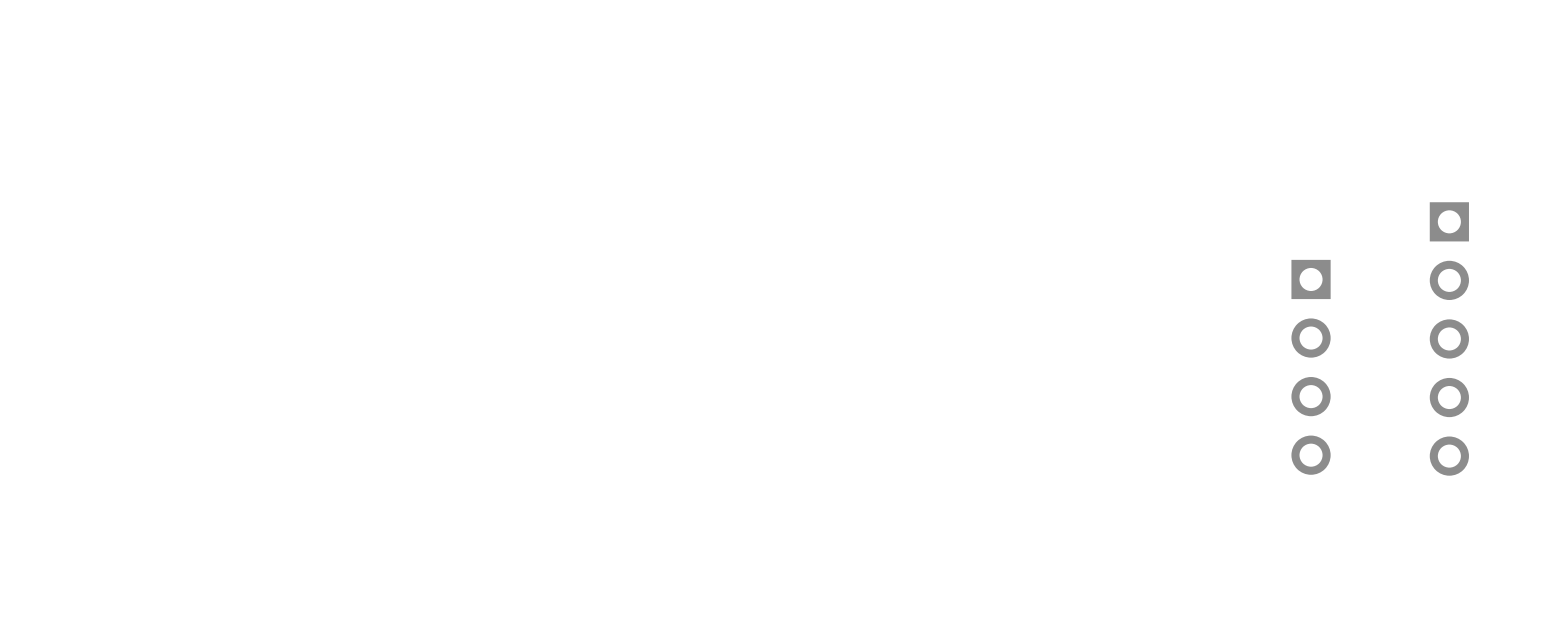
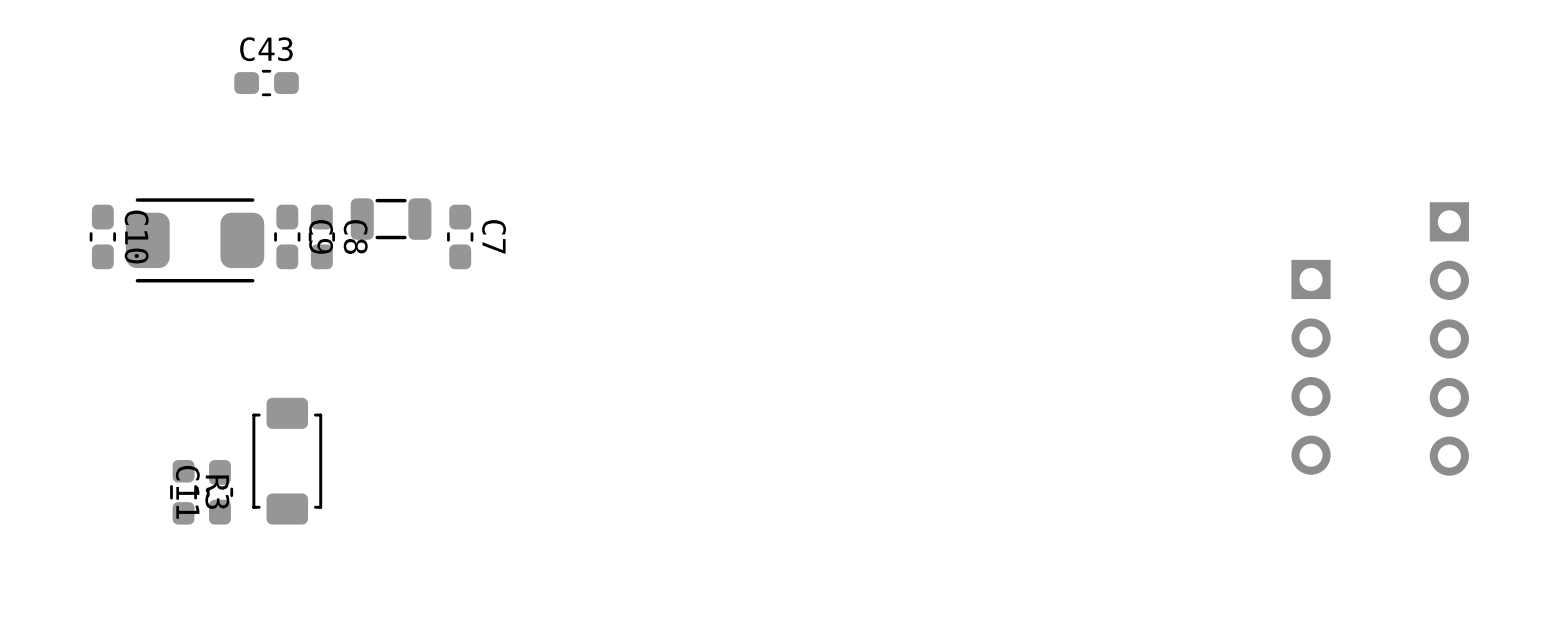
C43: none -> (266, 83)
part: none -> (391, 219)
C10: none -> (102, 236)
C9: none -> (287, 236)
C8: none -> (321, 236)
C7: none -> (460, 236)
part: none -> (195, 240)
part: none -> (287, 461)
R3: none -> (183, 492)
C11: none -> (219, 492)

